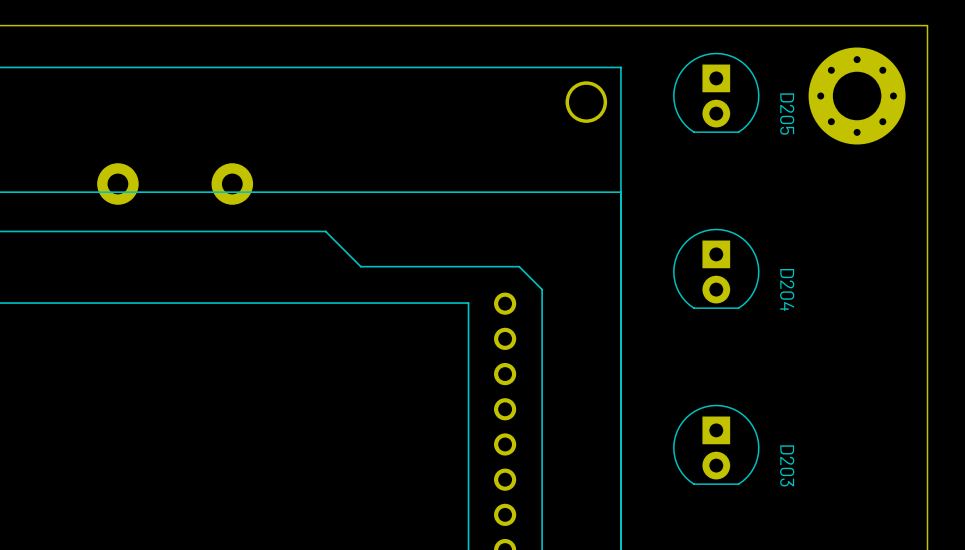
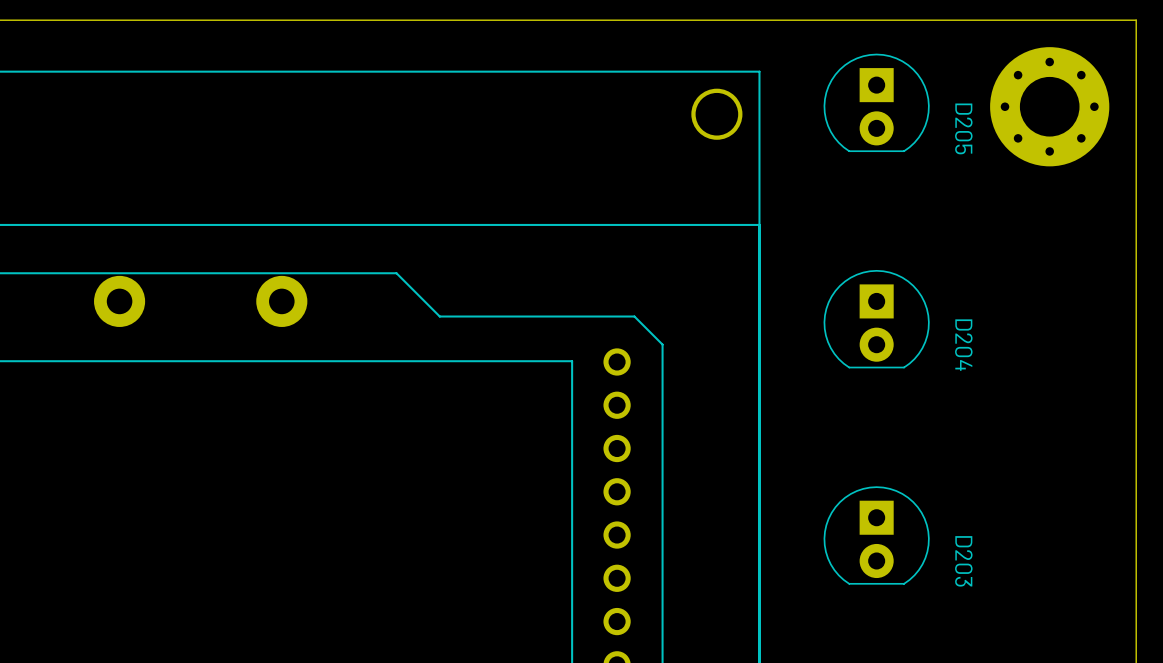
part: (117, 183) -> none
part: (232, 183) -> none
part: none -> (119, 301)
part: none -> (281, 301)

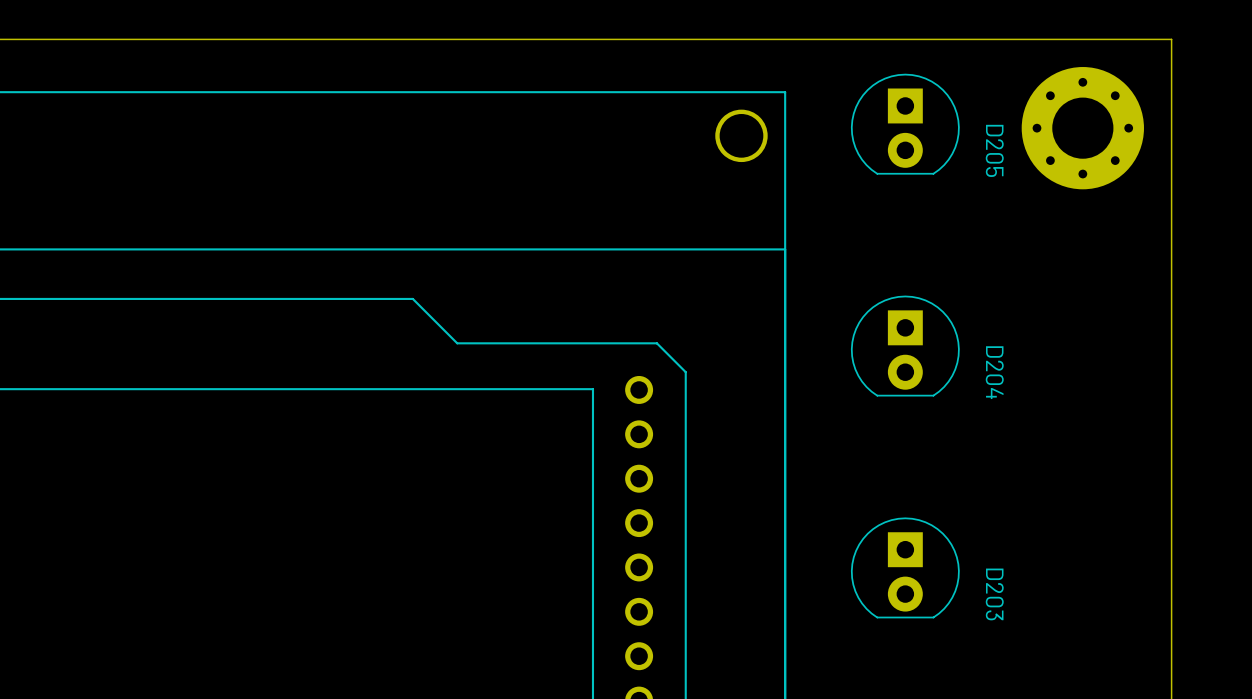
part: (119, 301) -> none
part: (281, 301) -> none

